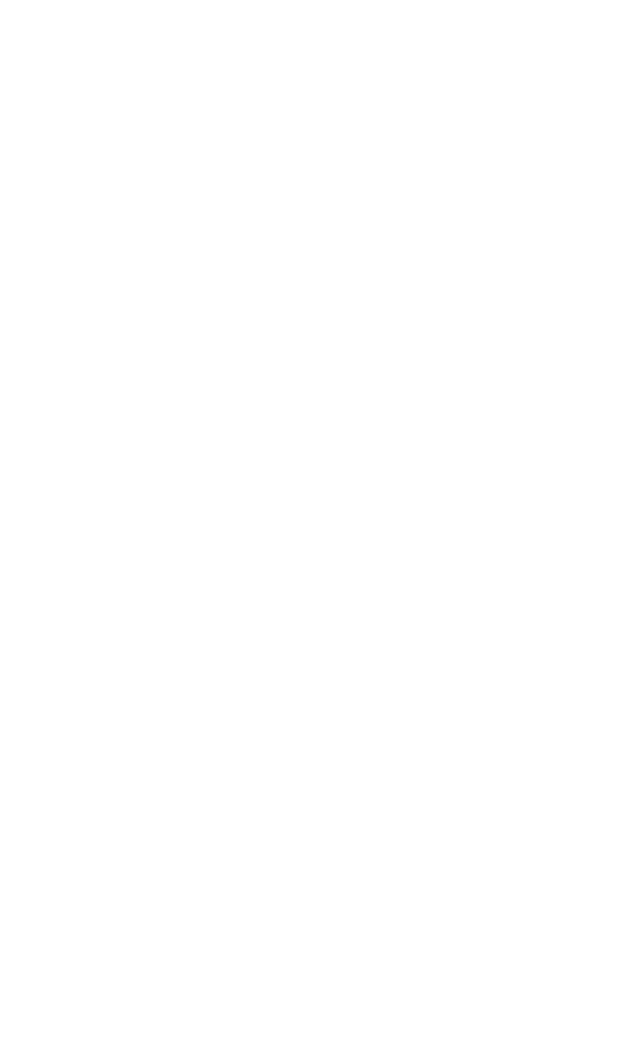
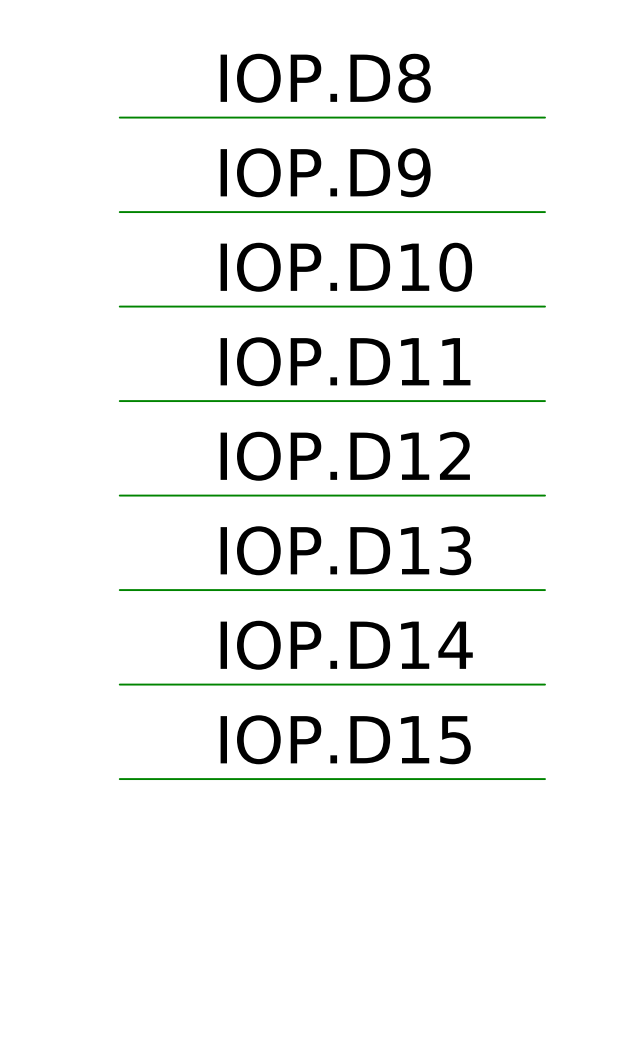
label: none -> IOP.D8 (325, 78)
wire: none -> (119, 117) (545, 117)
label: none -> IOP.D9 (325, 172)
wire: none -> (119, 212) (545, 212)
label: none -> IOP.D10 (346, 267)
wire: none -> (119, 306) (545, 306)
label: none -> IOP.D11 (345, 361)
wire: none -> (119, 401) (545, 401)
label: none -> IOP.D12 (345, 456)
wire: none -> (119, 495) (545, 495)
label: none -> IOP.D13 (345, 550)
wire: none -> (119, 590) (545, 590)
label: none -> IOP.D14 (346, 645)
wire: none -> (119, 684) (545, 684)
label: none -> IOP.D15 (345, 739)
wire: none -> (119, 779) (545, 779)

